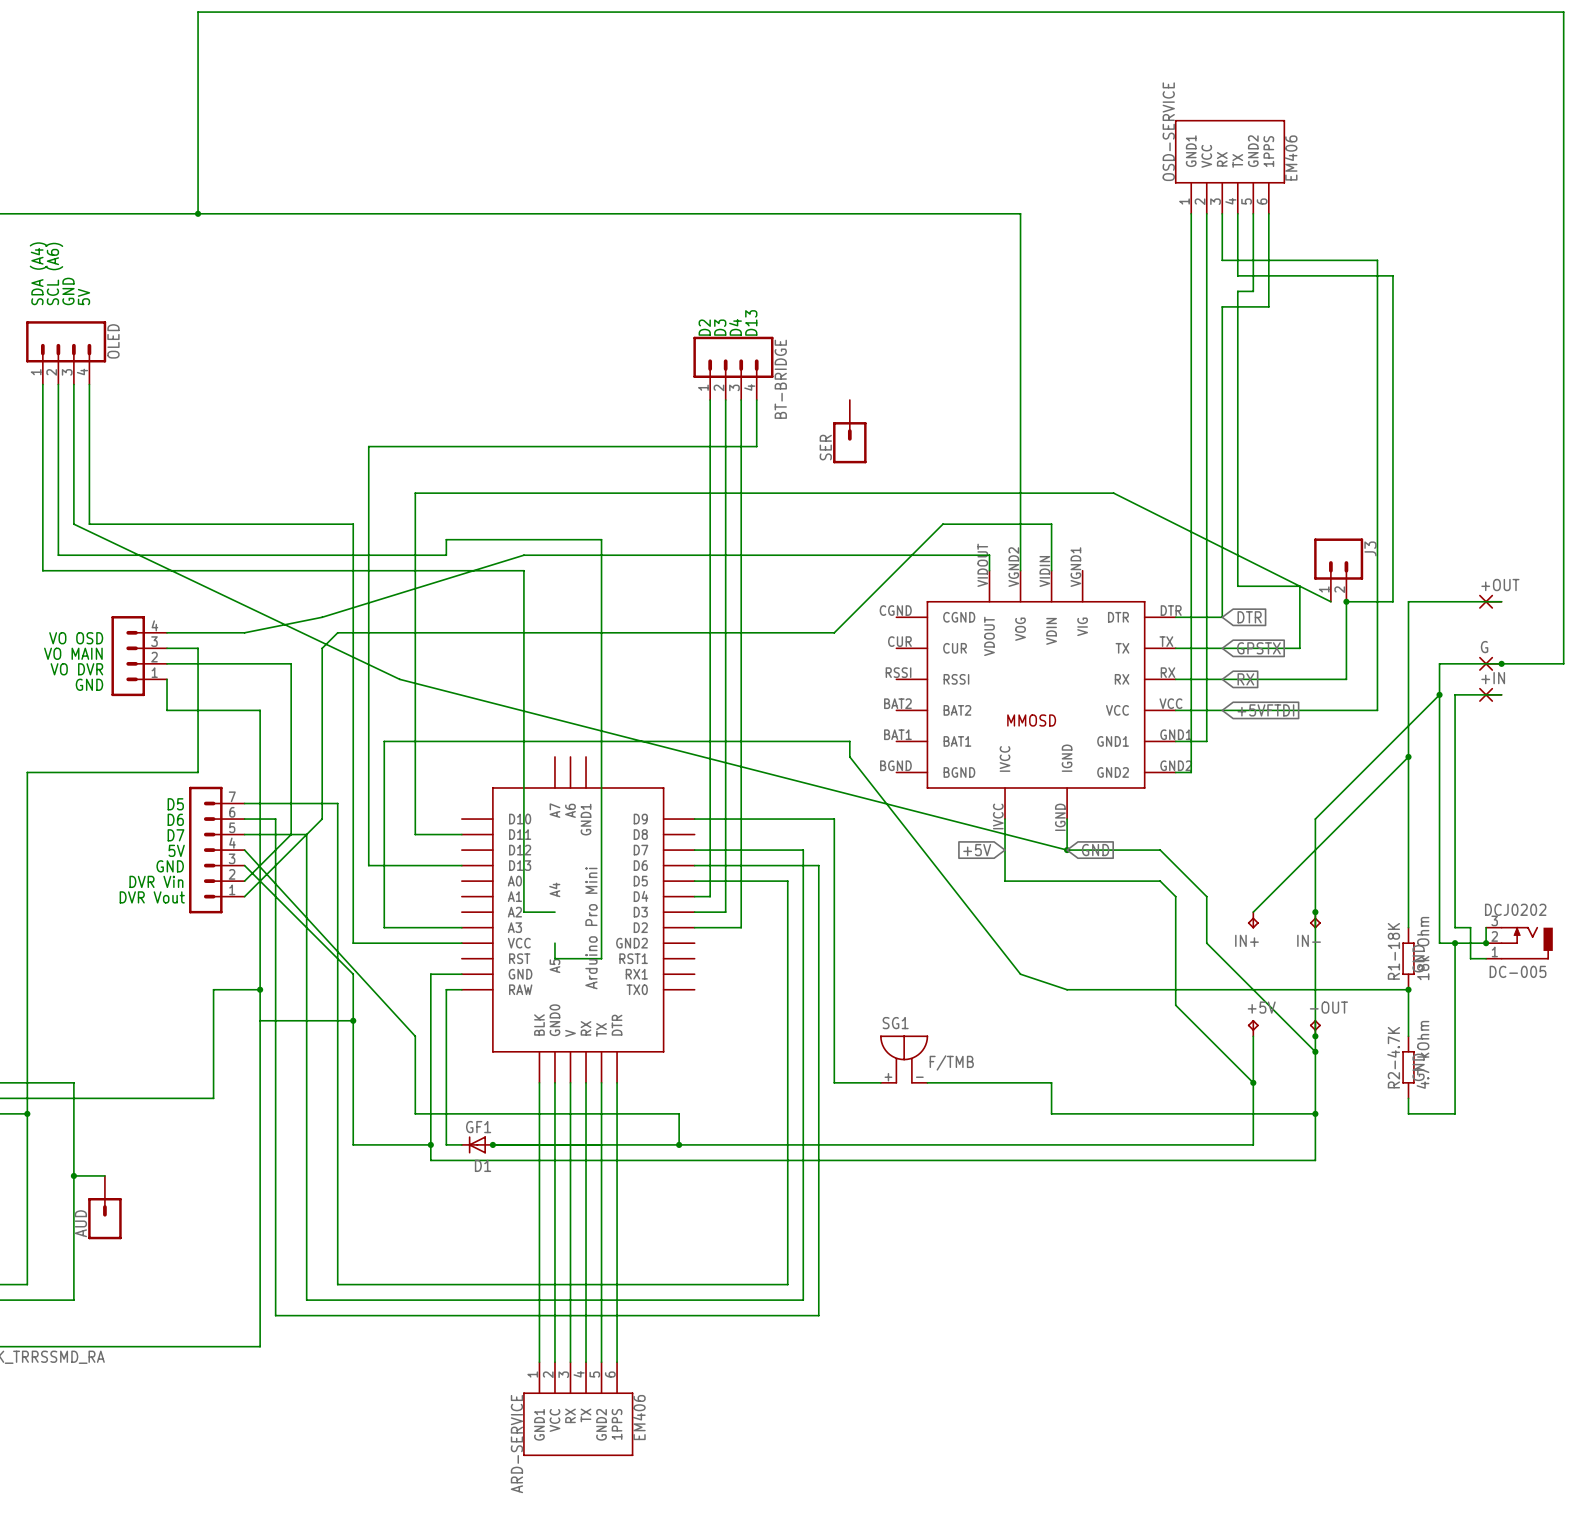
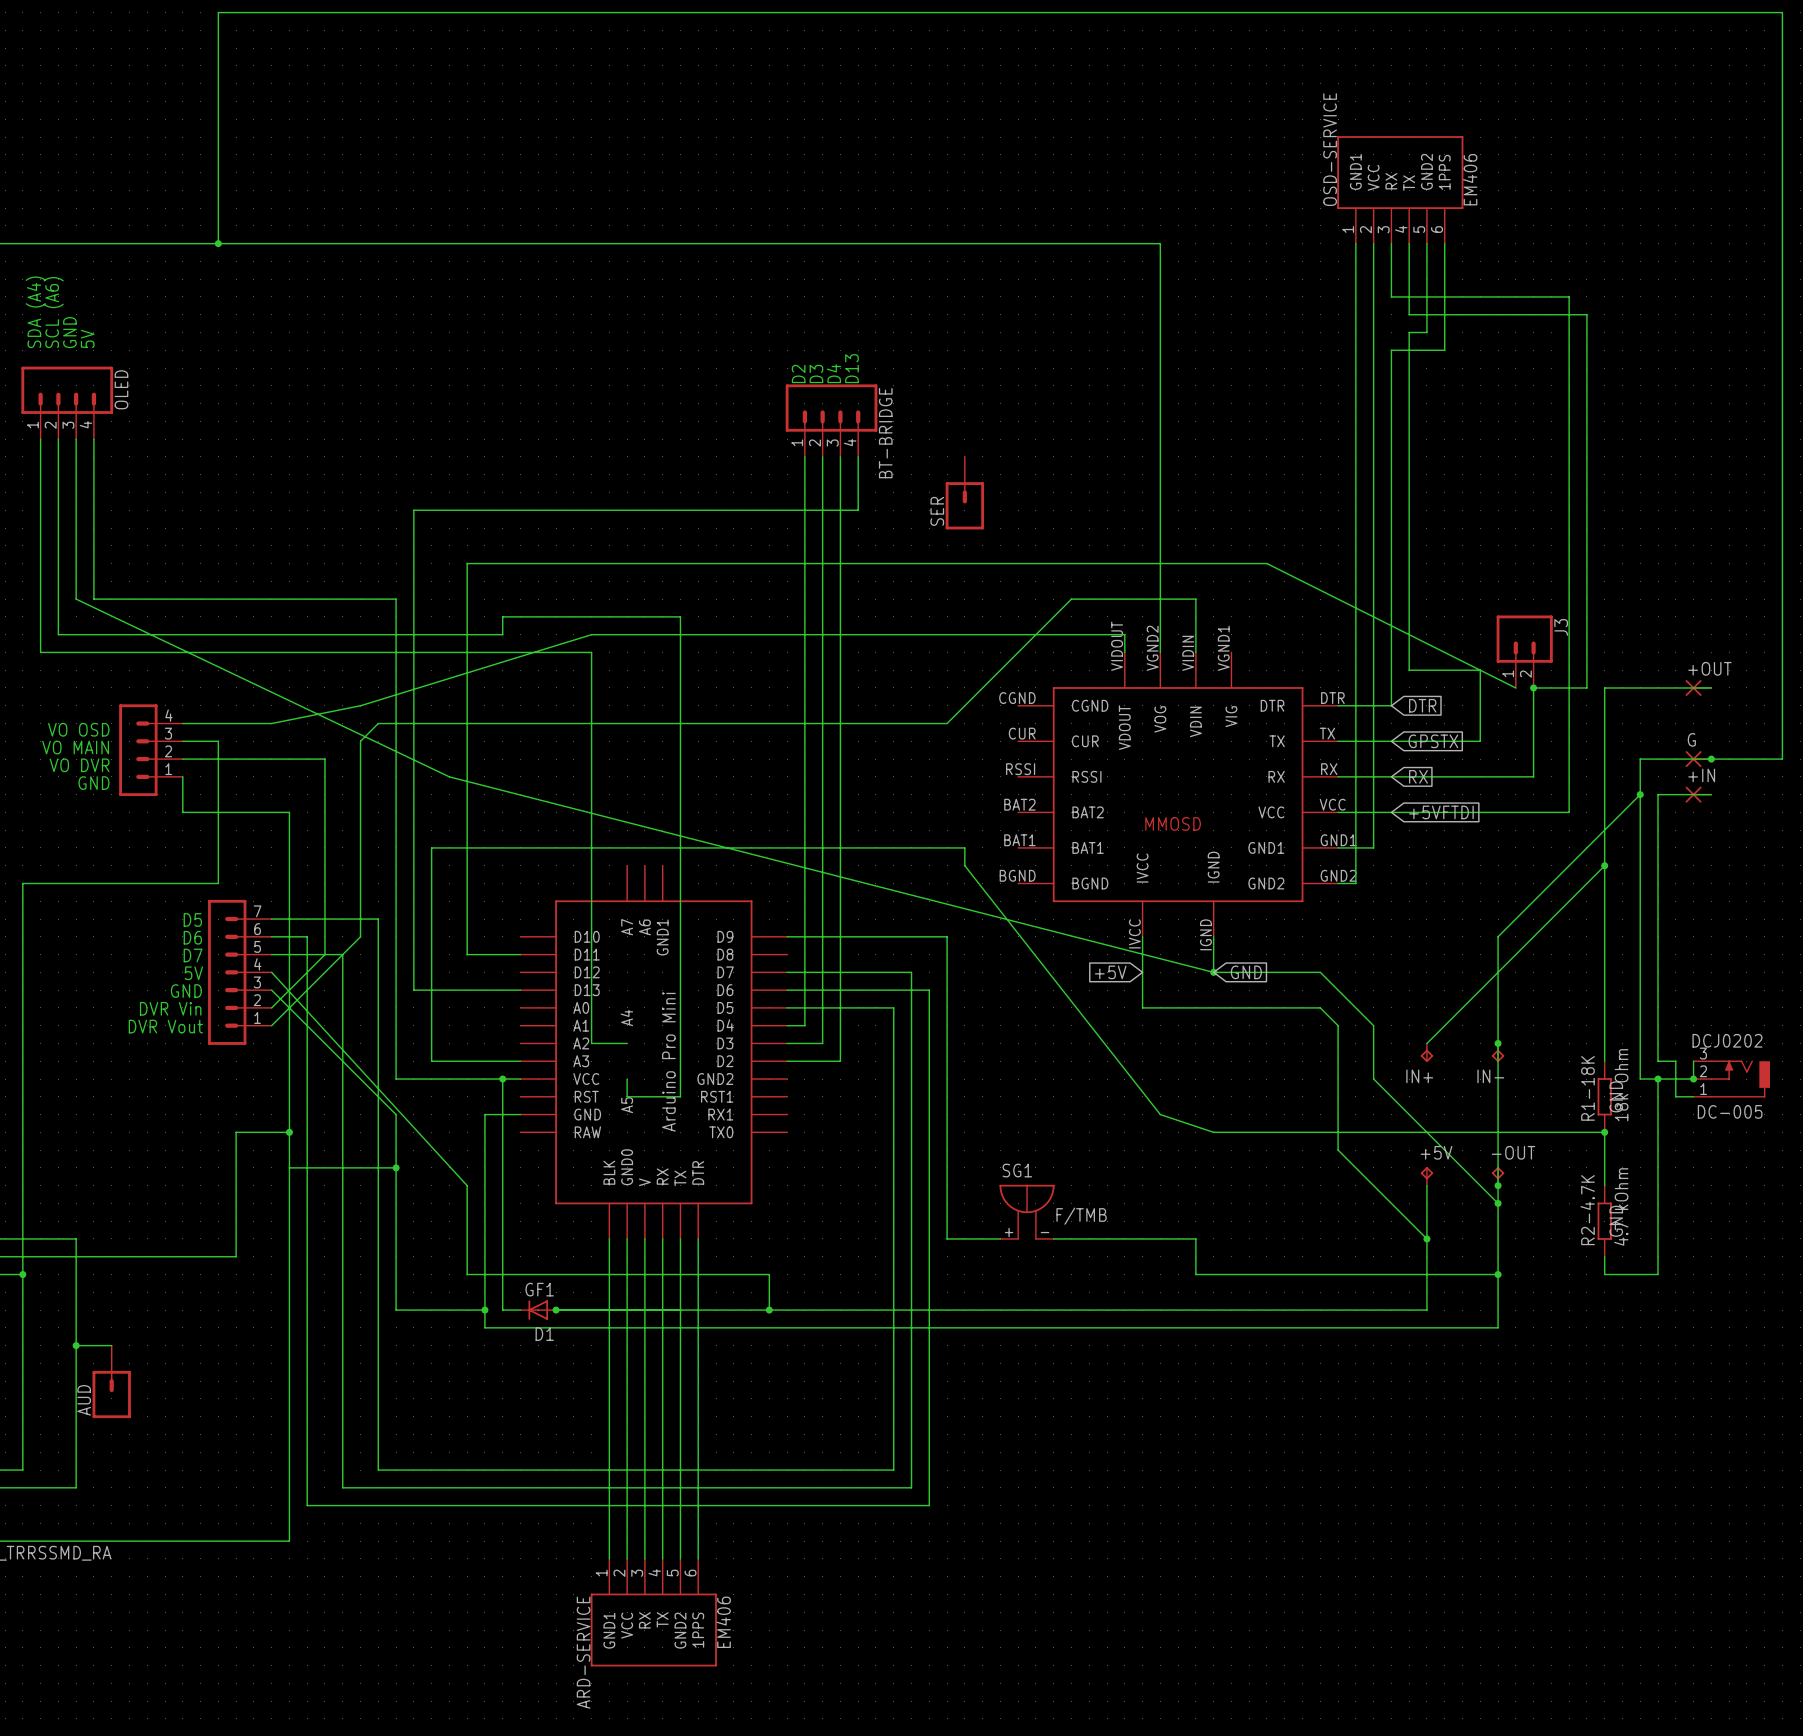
junction: none -> (502, 1079)
wire: (446, 989) (461, 989) -> (502, 1132) (502, 1079)

